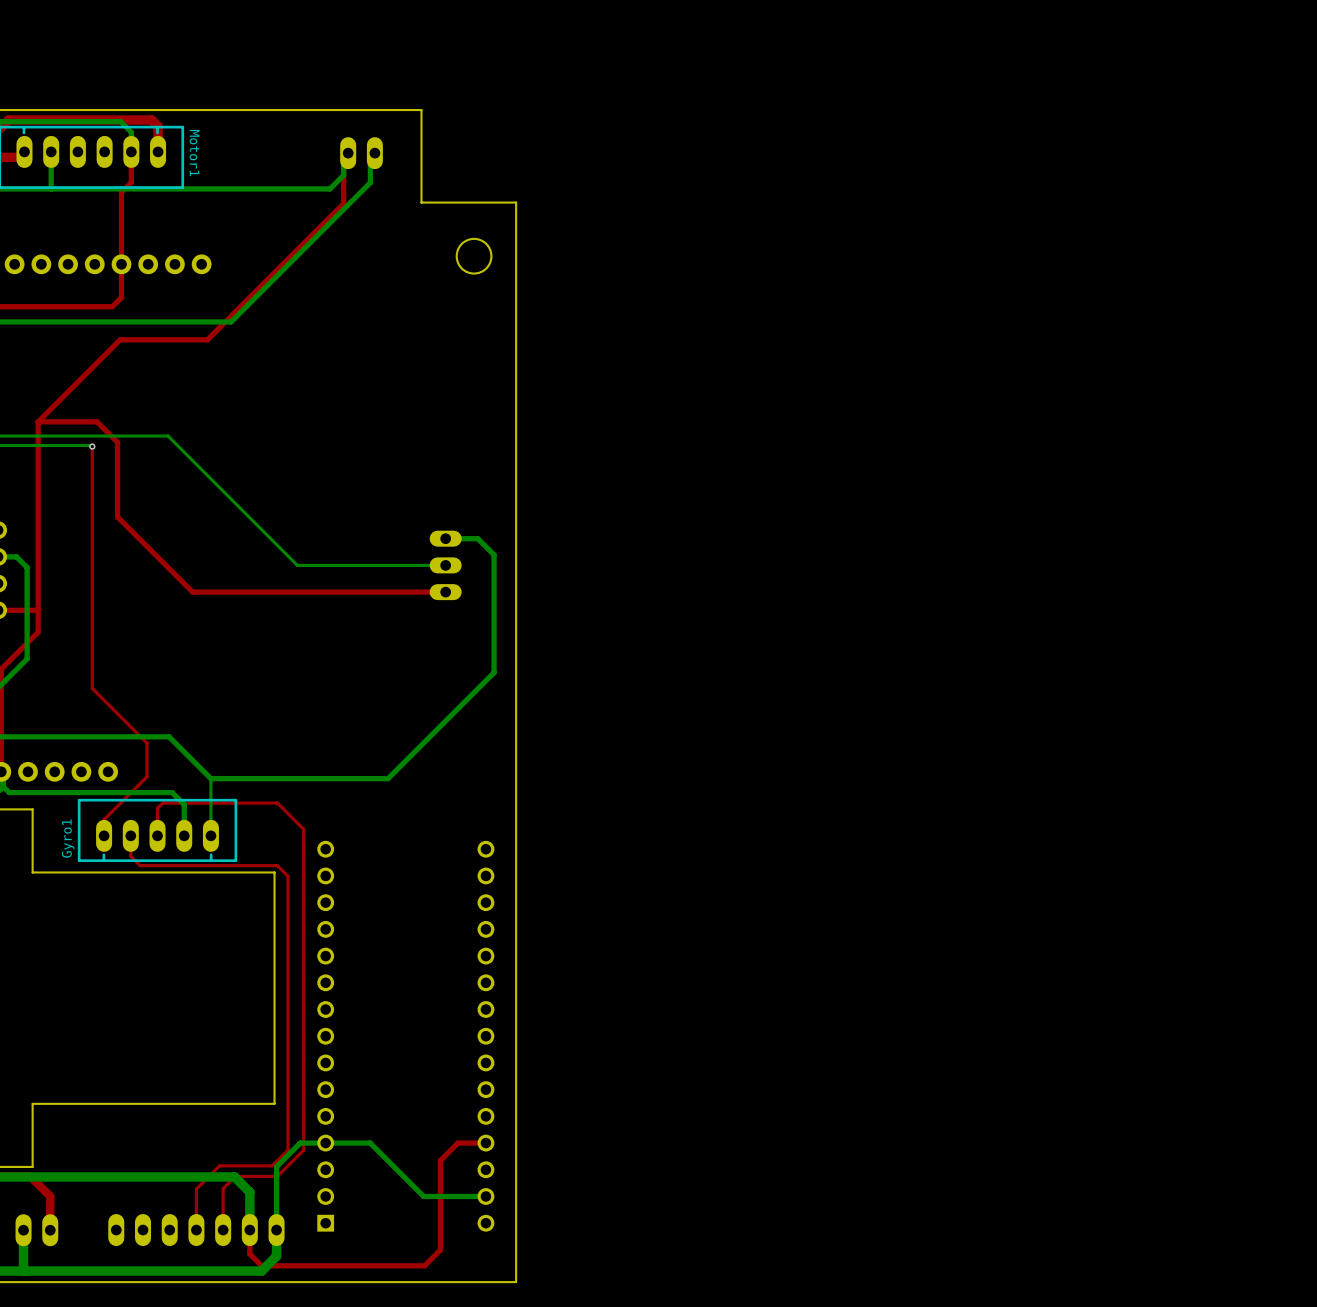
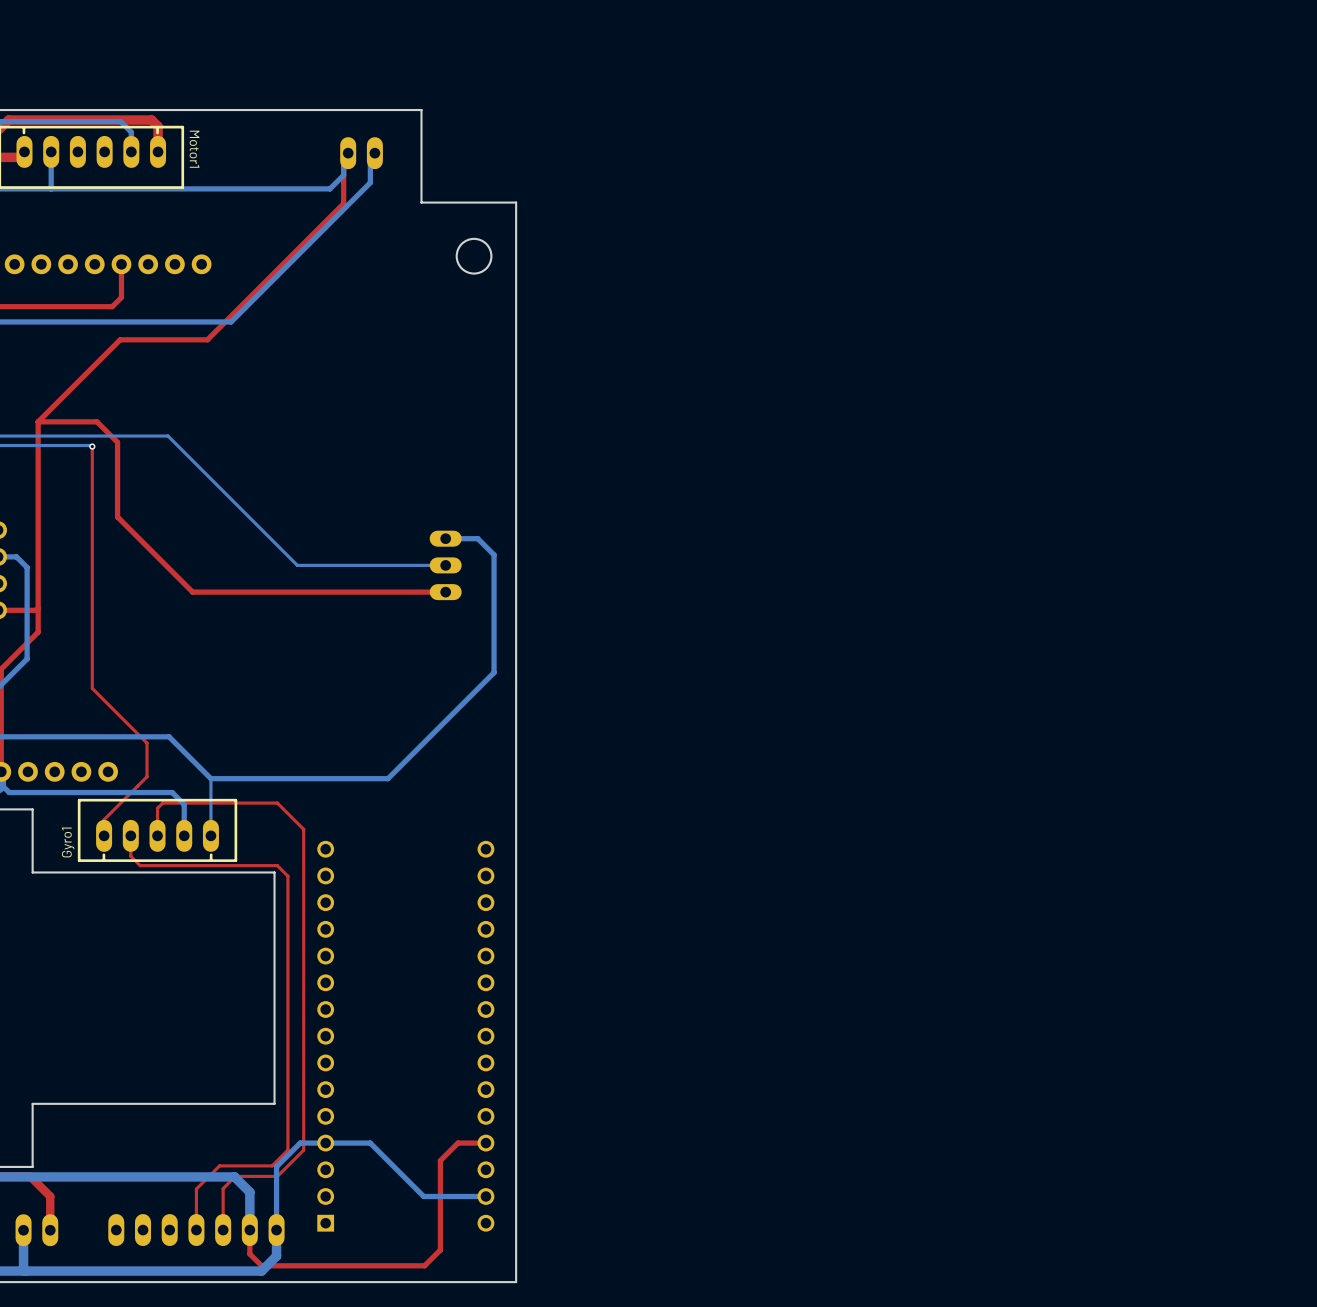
top track: (131, 151) (131, 182) (121, 192) (121, 264) -> none

